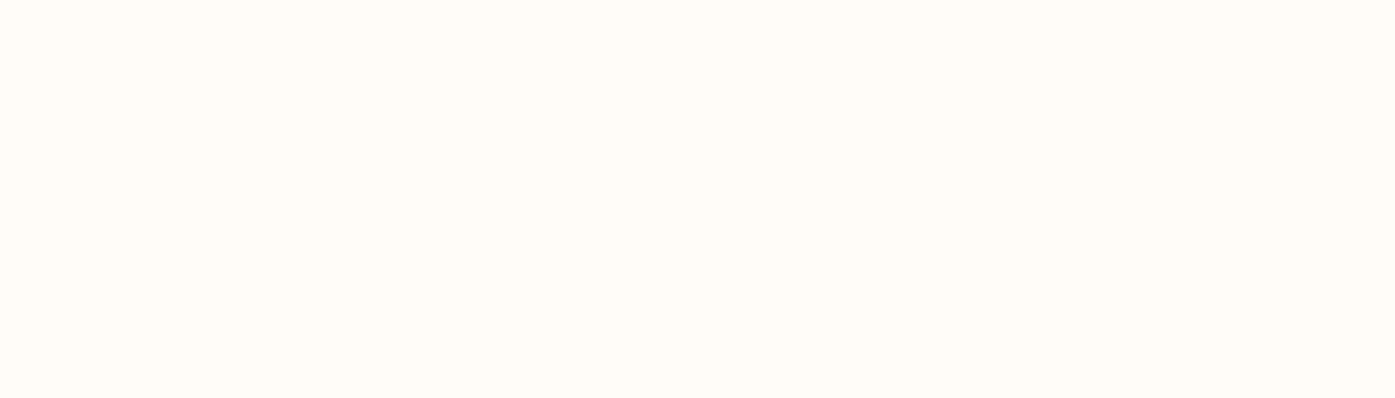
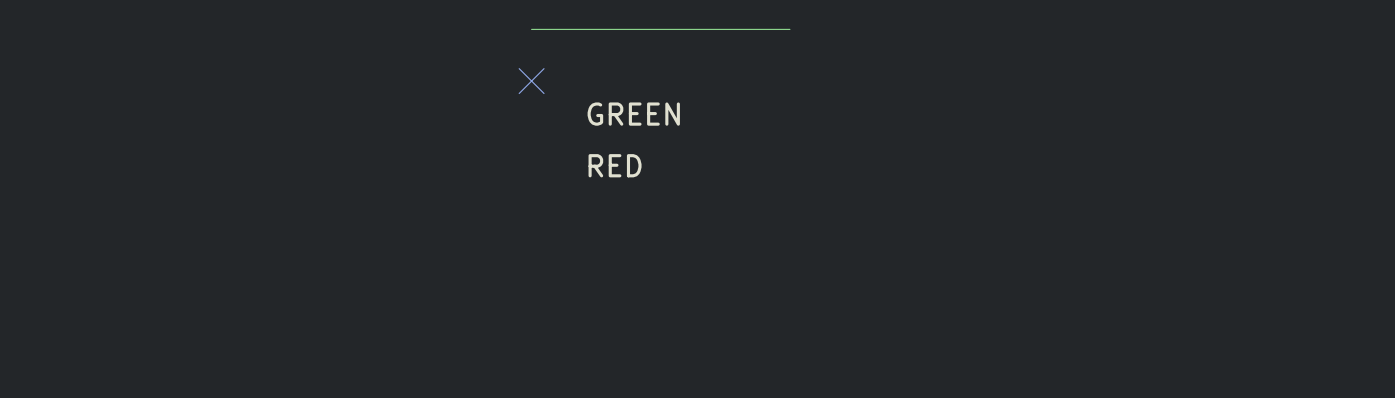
wire: none -> (531, 29) (789, 29)
no-connect mark: none -> (531, 81)
label: none -> GREEN (633, 114)
label: none -> RED (615, 165)

